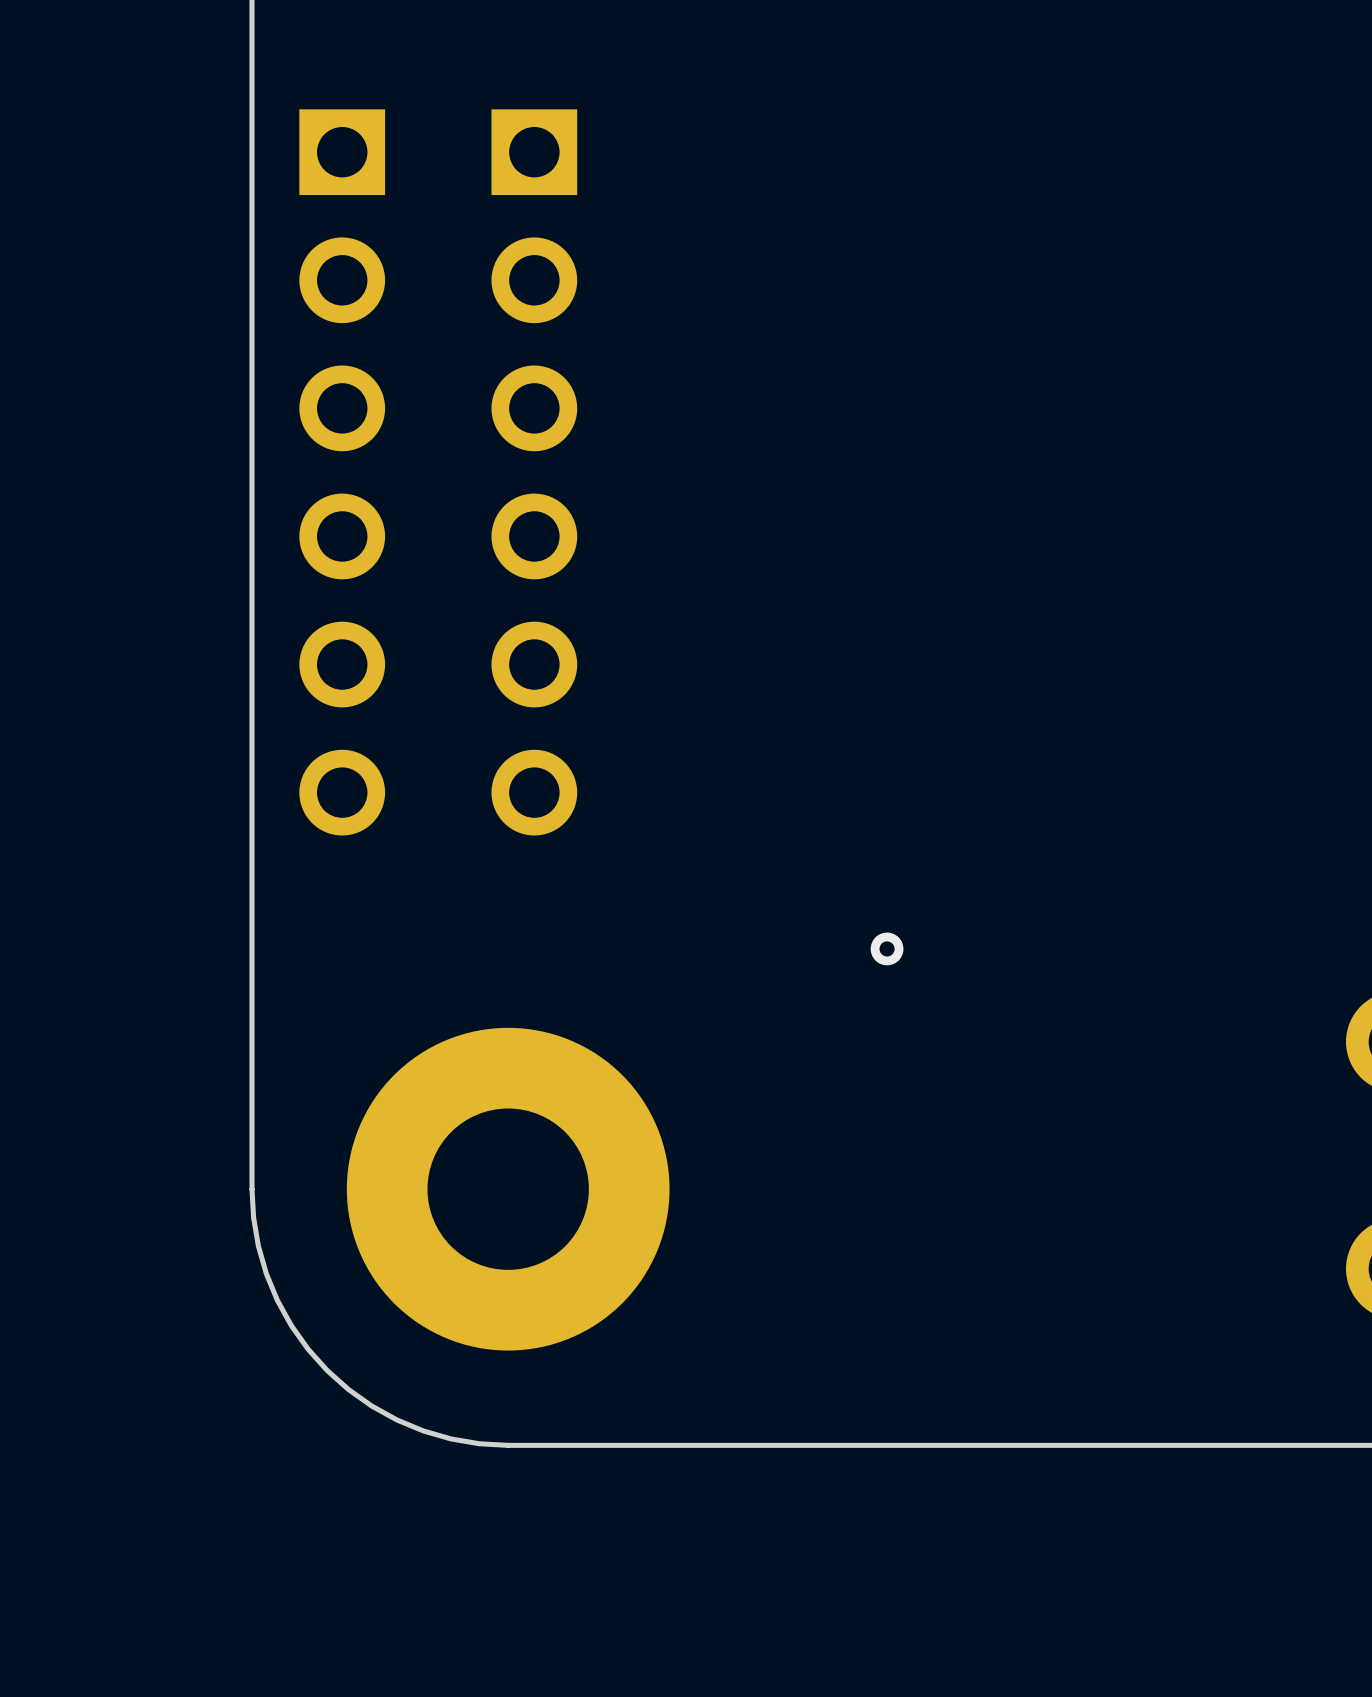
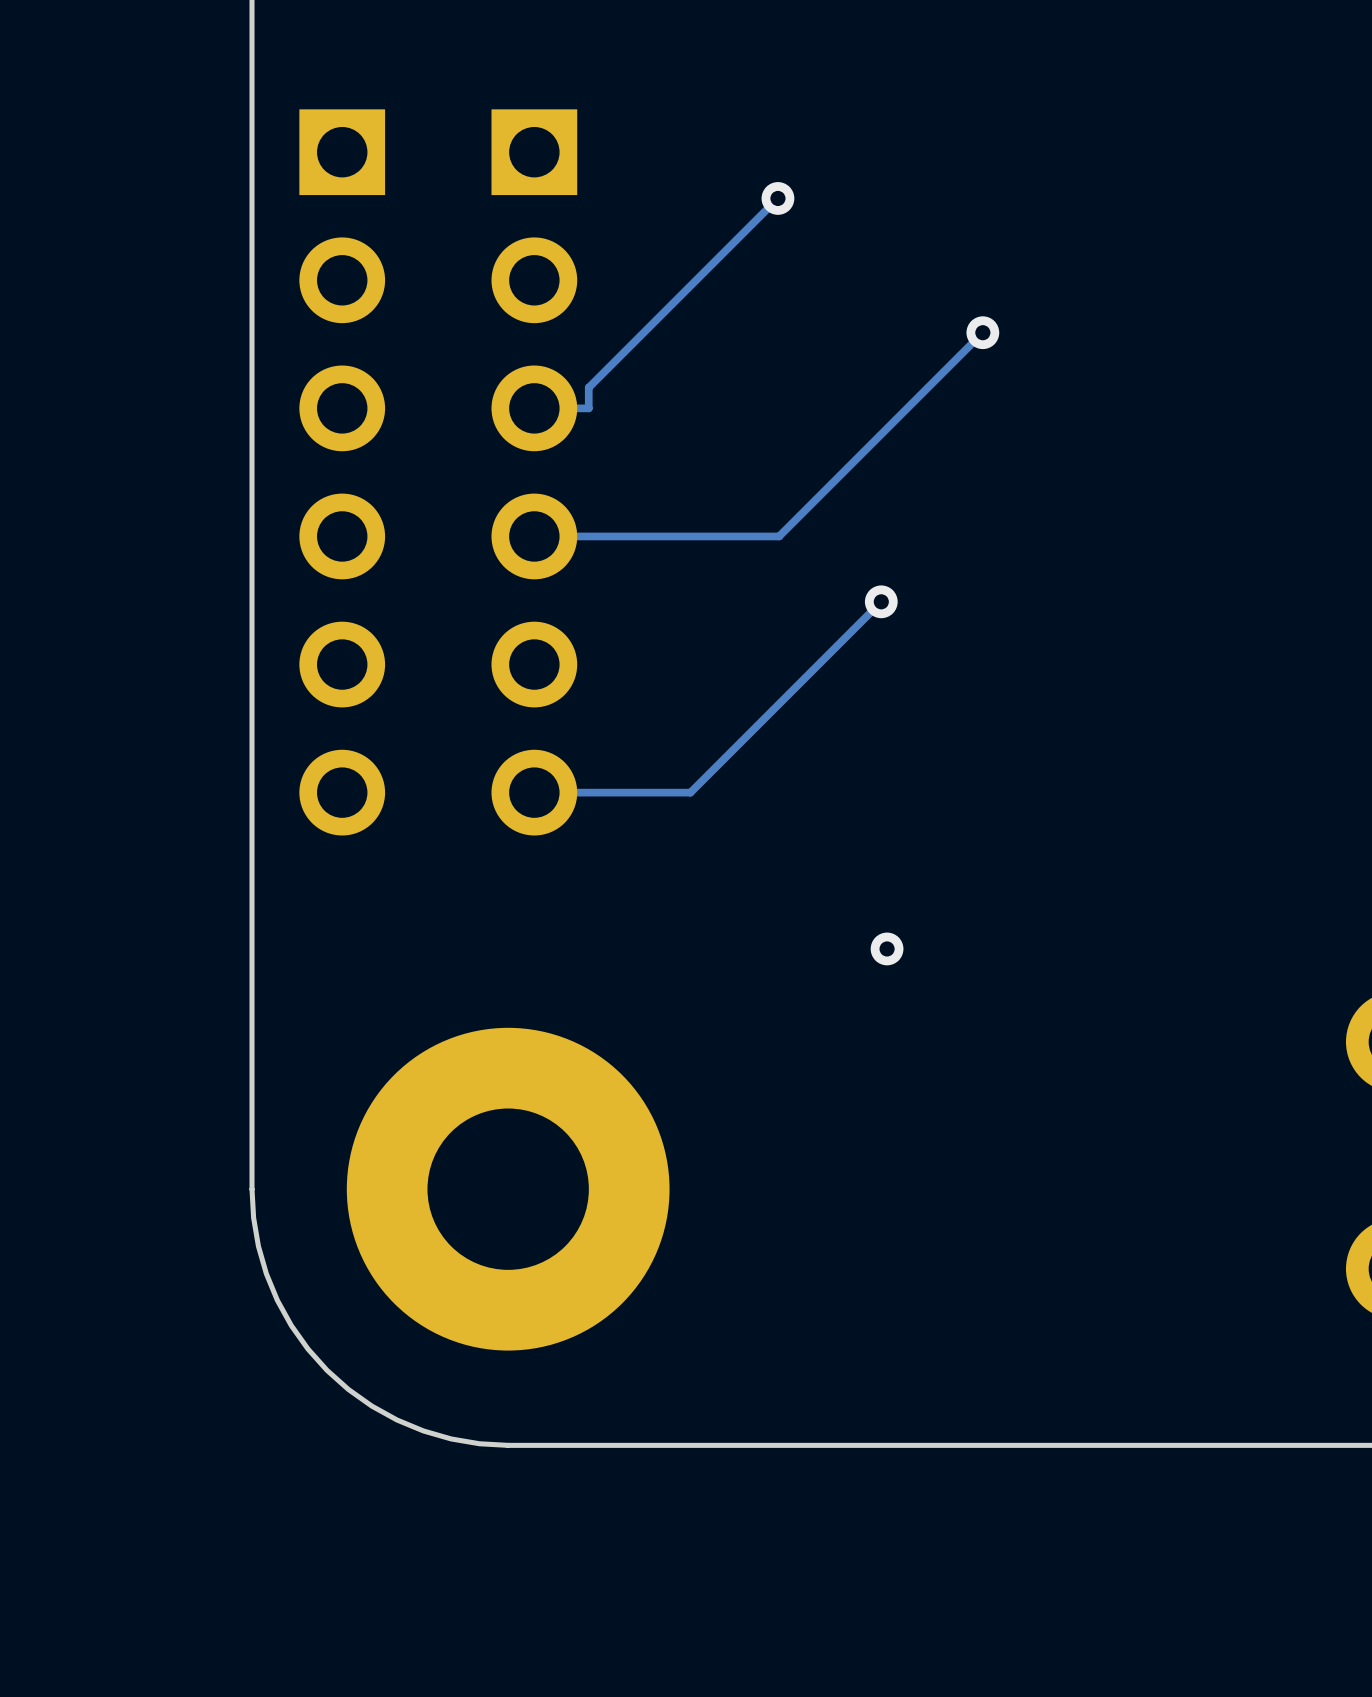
track: none -> (777, 198) (588, 387) (588, 408) (534, 408)
via: none -> (777, 198)
track: none -> (982, 332) (779, 536) (534, 536)
via: none -> (982, 332)
track: none -> (881, 601) (690, 792) (534, 792)
via: none -> (881, 601)

